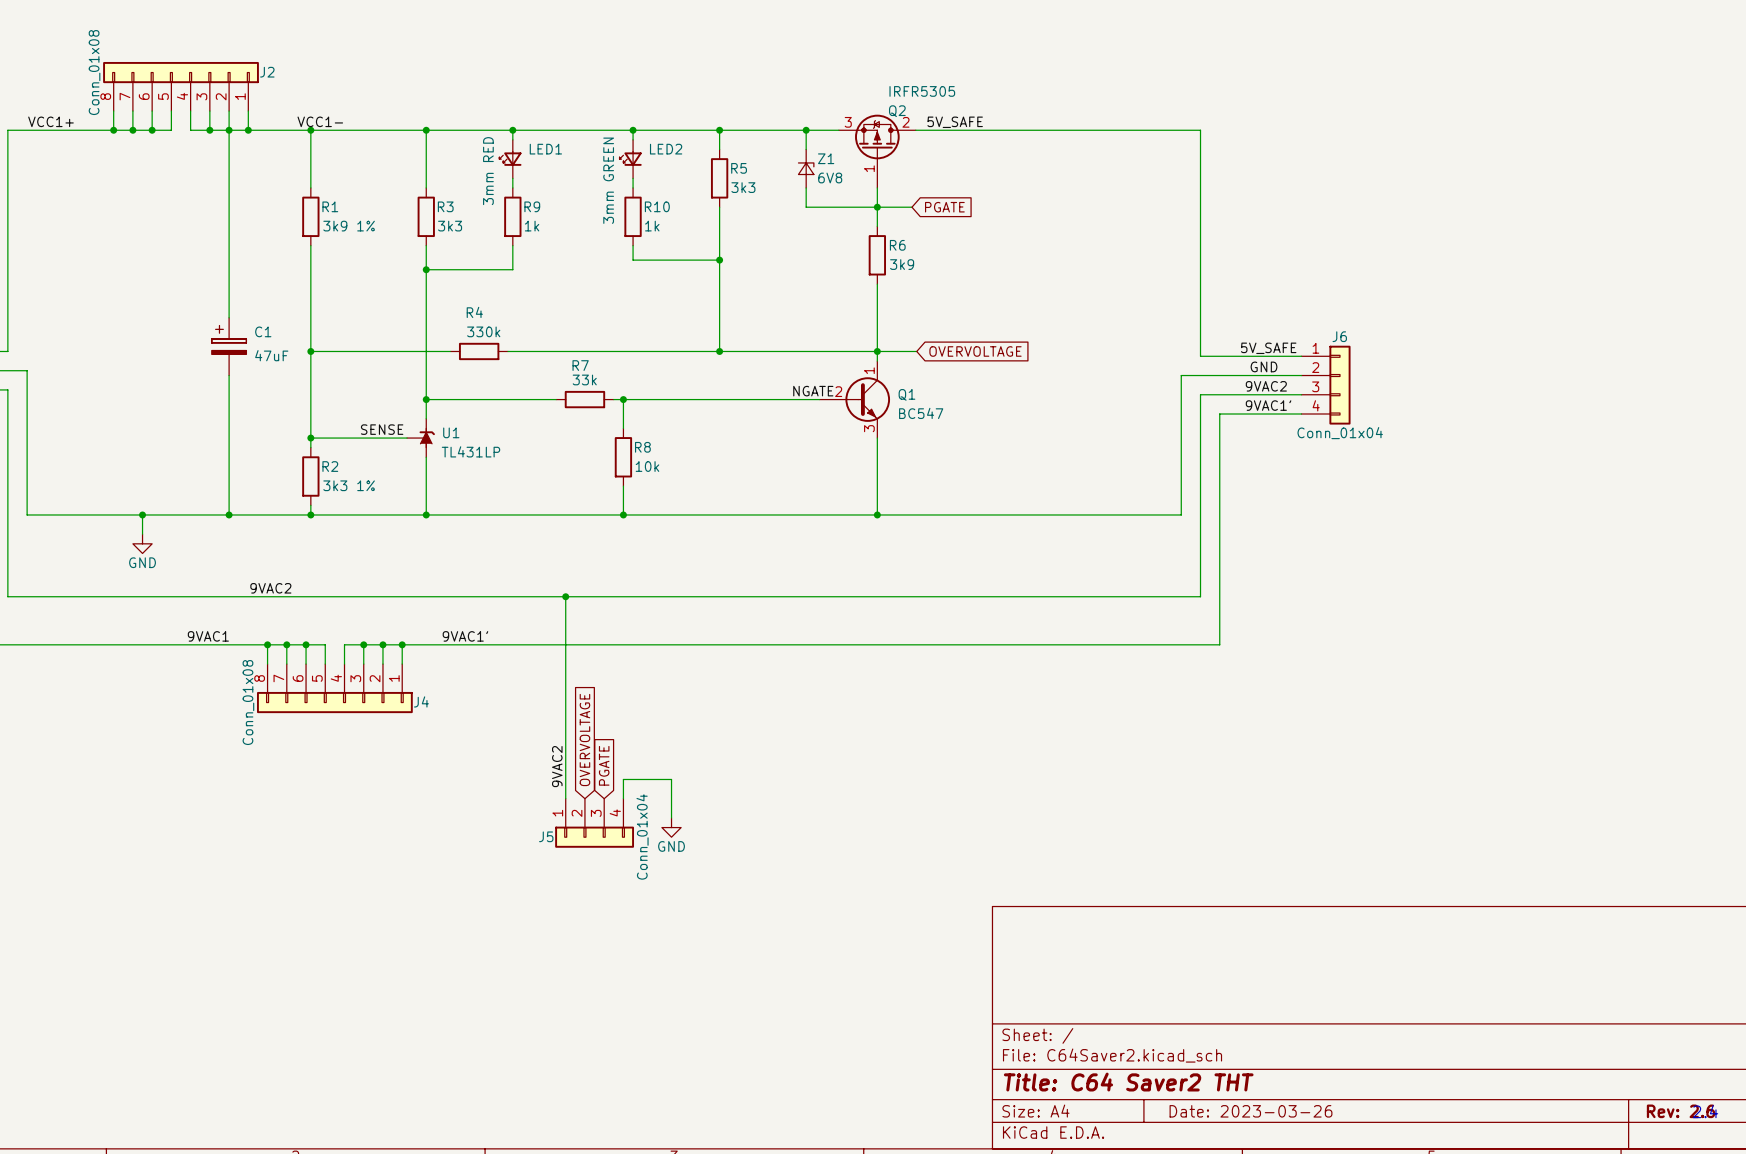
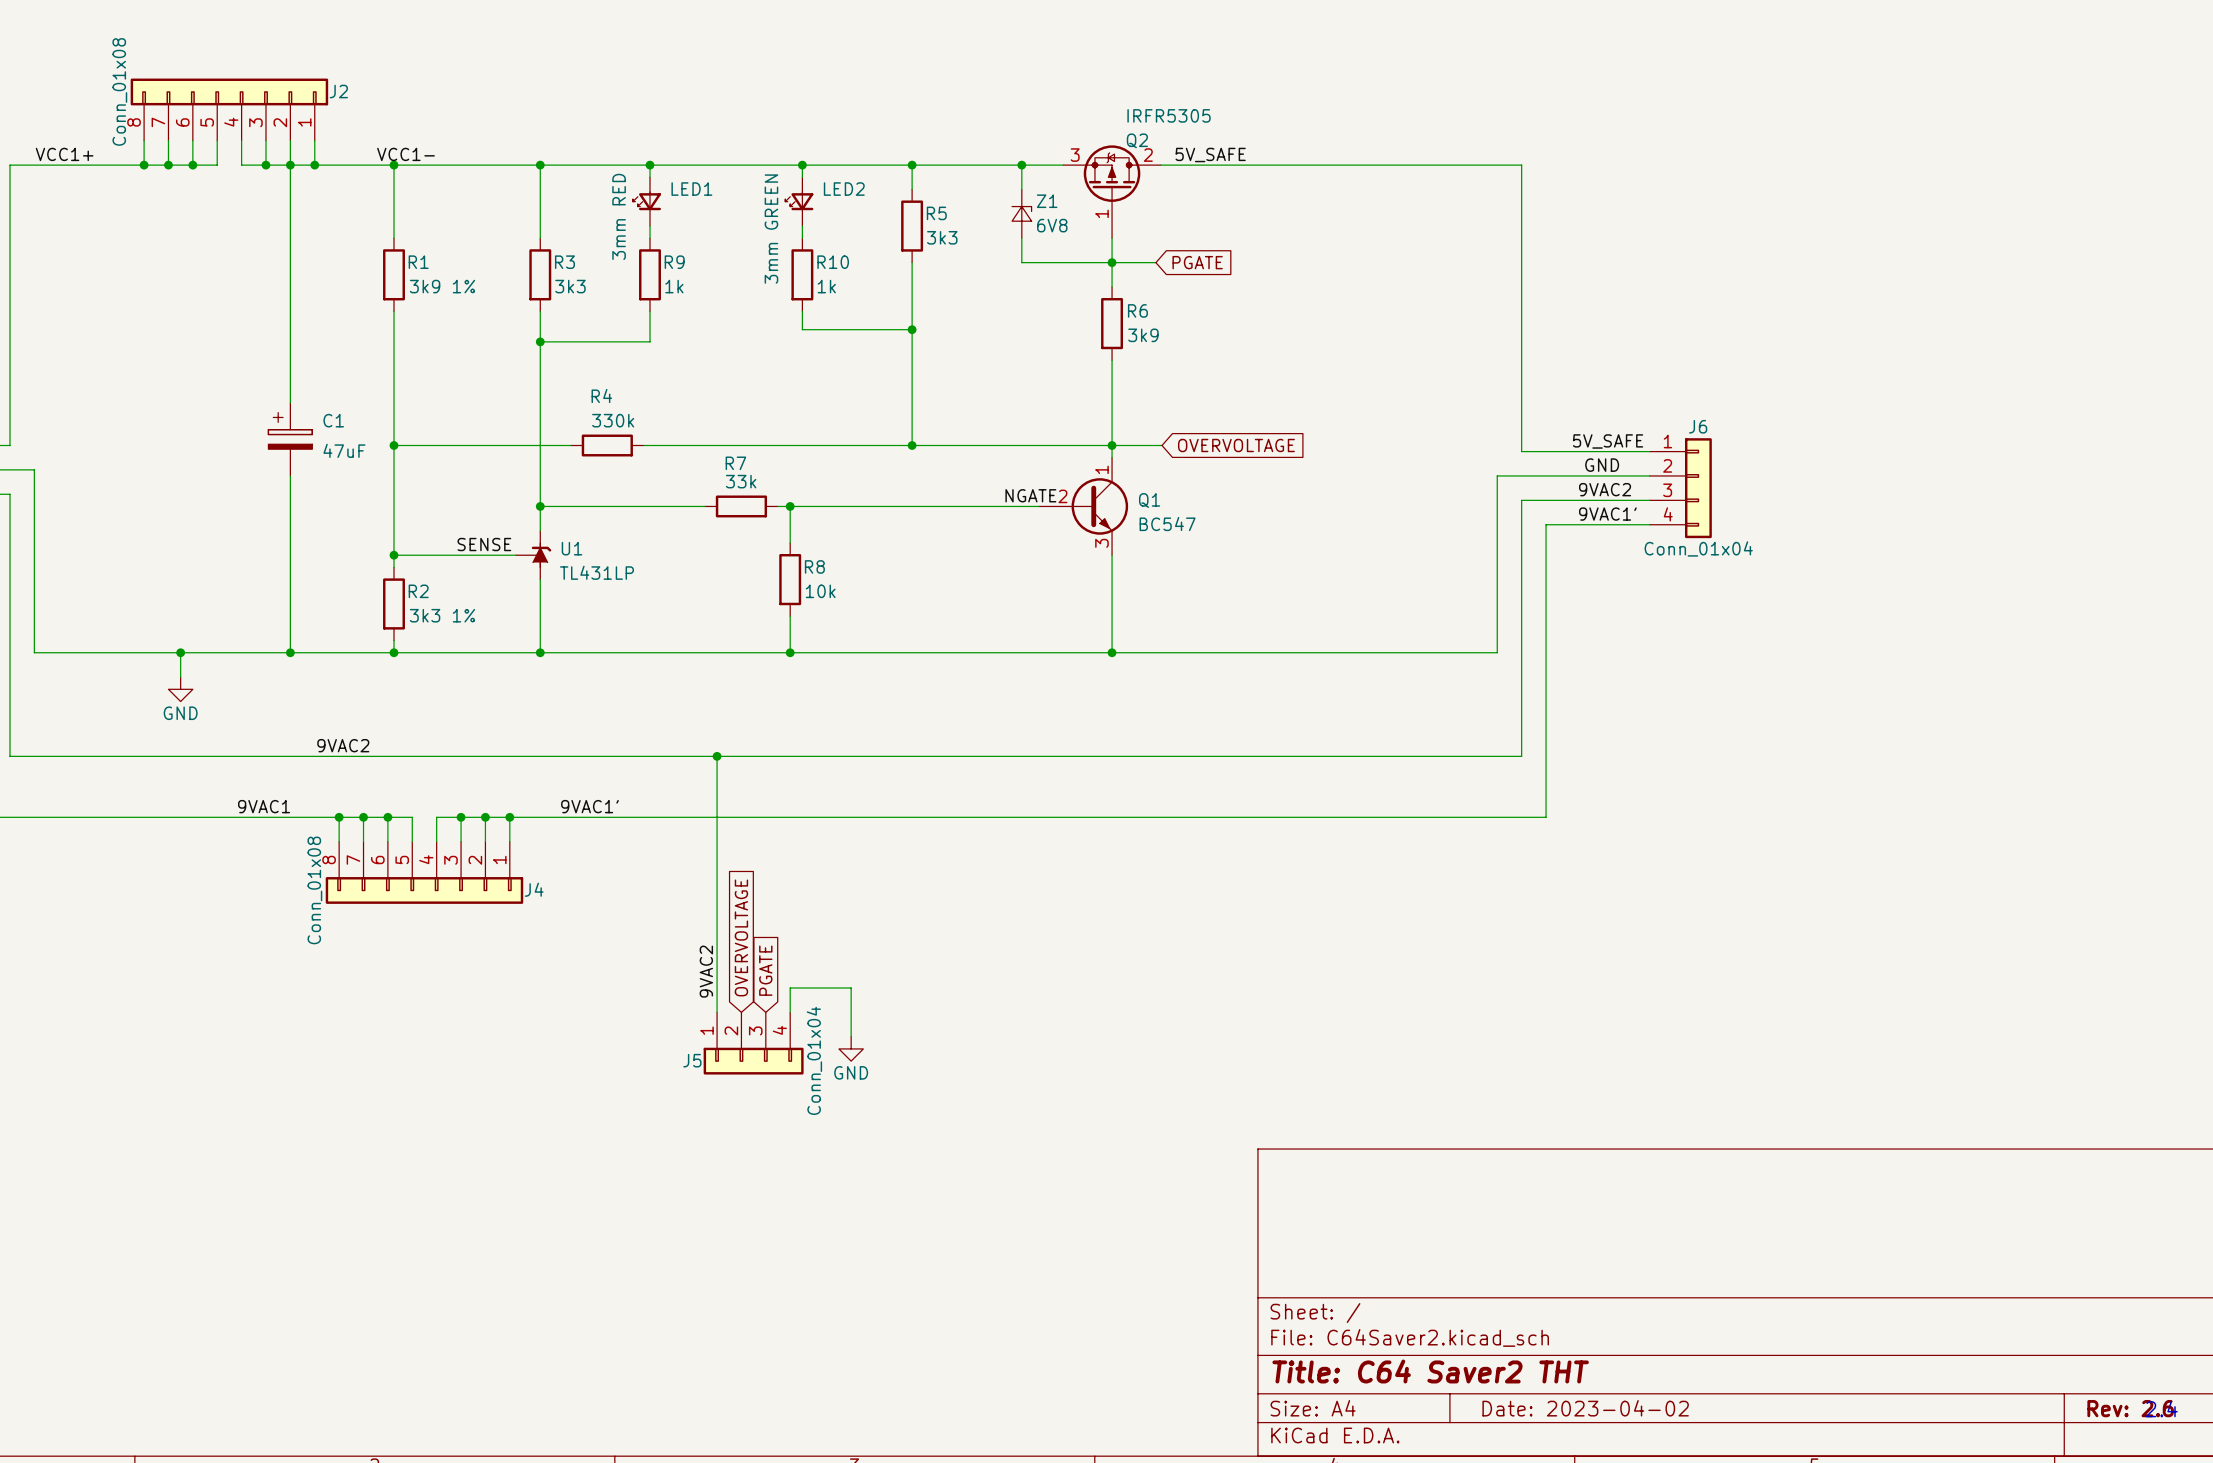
title block: Date: 2023-03-26 (1250, 1111) -> Date: 2023-04-02 (1585, 1408)

